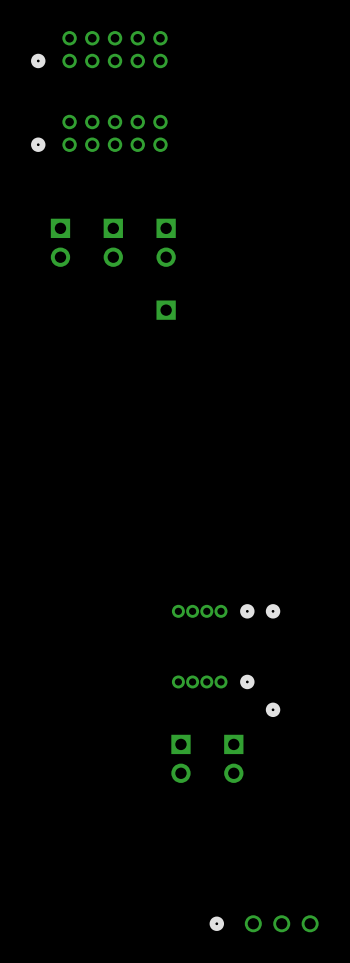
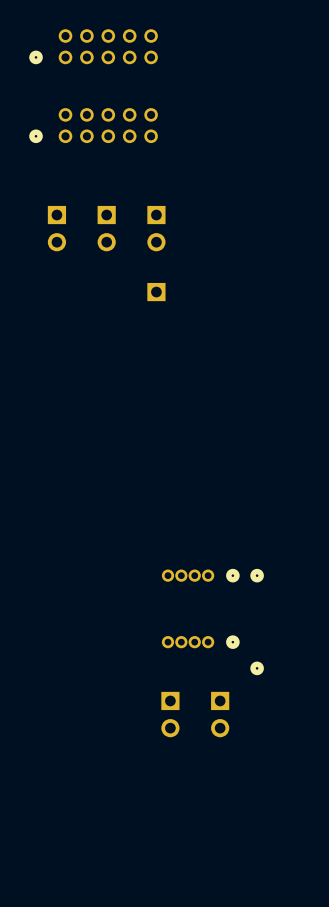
part: (264, 923) -> none

